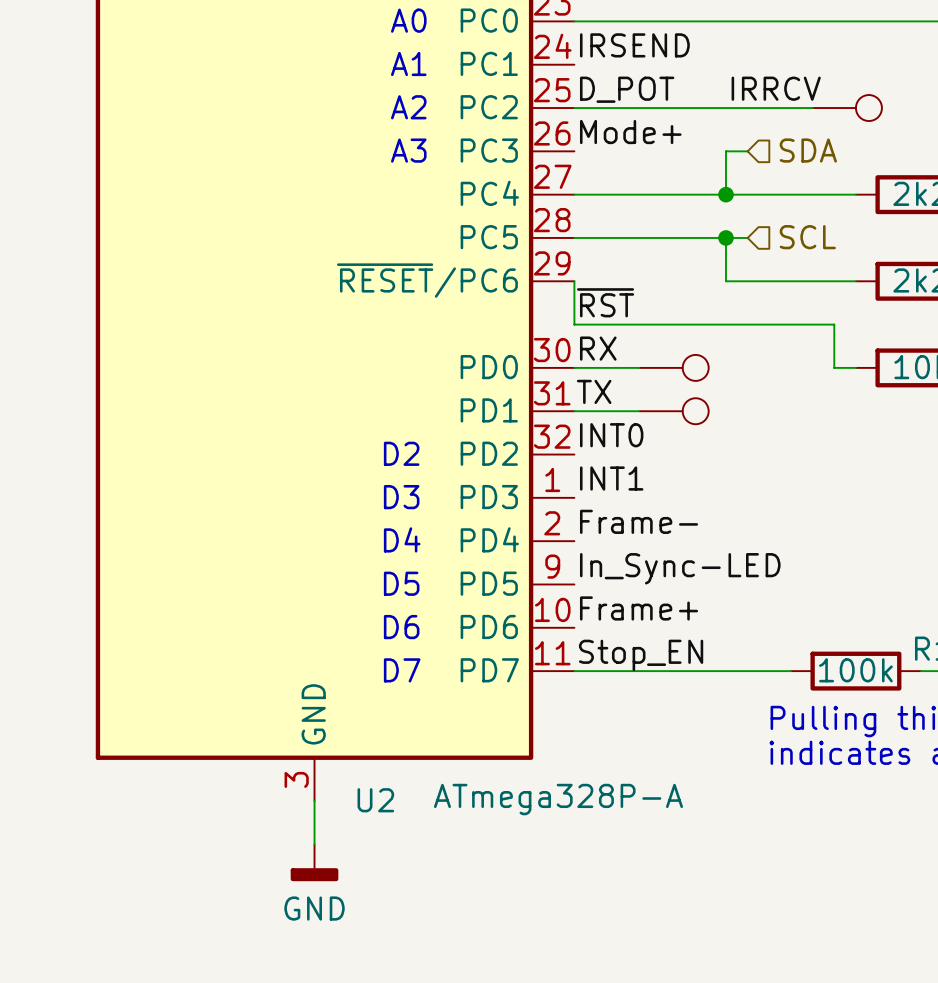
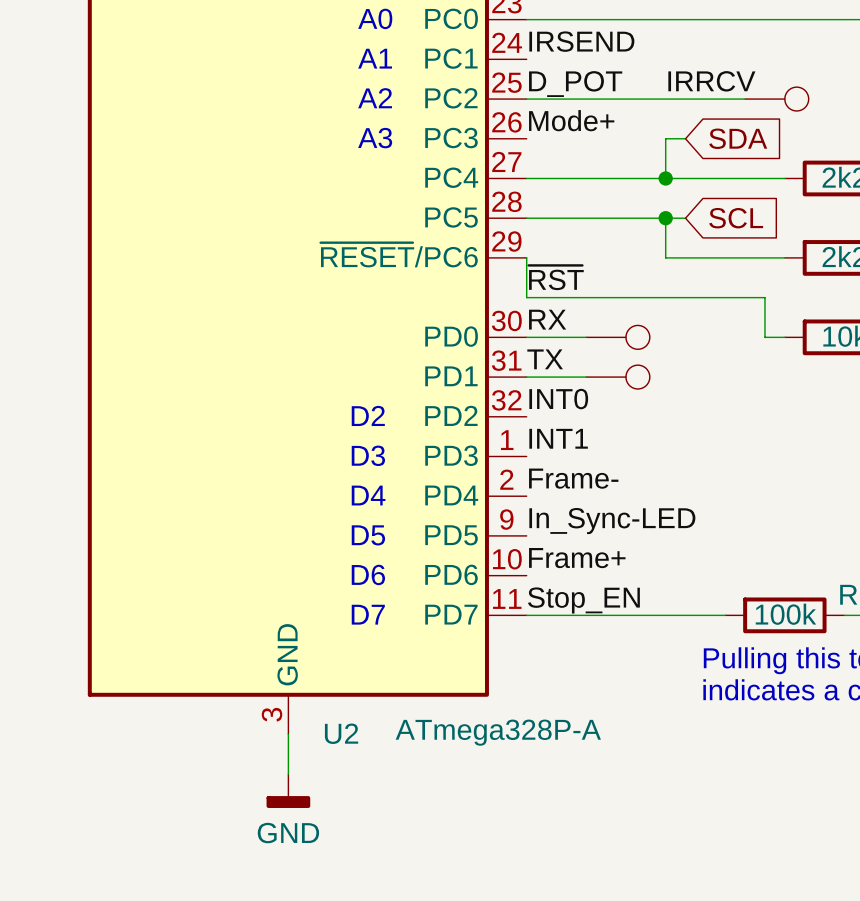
hierarchical label: SDA (808, 150) -> none
global label: none -> SDA (738, 138)
global label: none -> SCL (736, 218)
hierarchical label: SCL (807, 237) -> none

